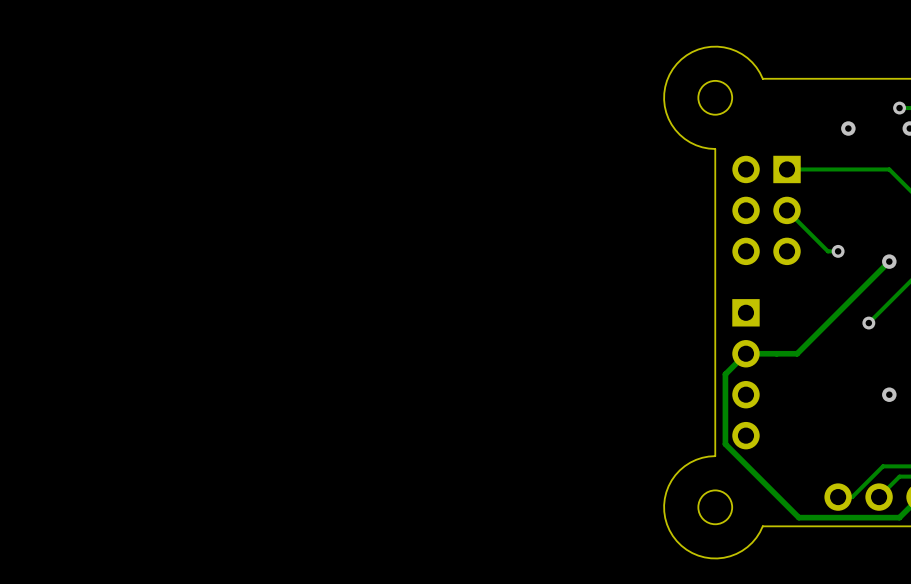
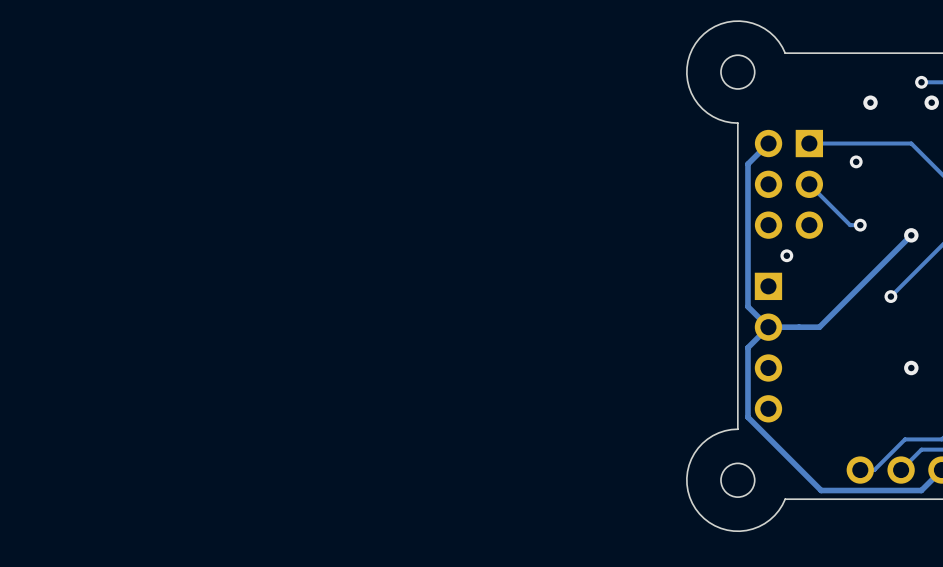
track: none -> (768, 143) (747, 164) (747, 306) (768, 327)
via: none -> (856, 161)
via: none -> (786, 255)

